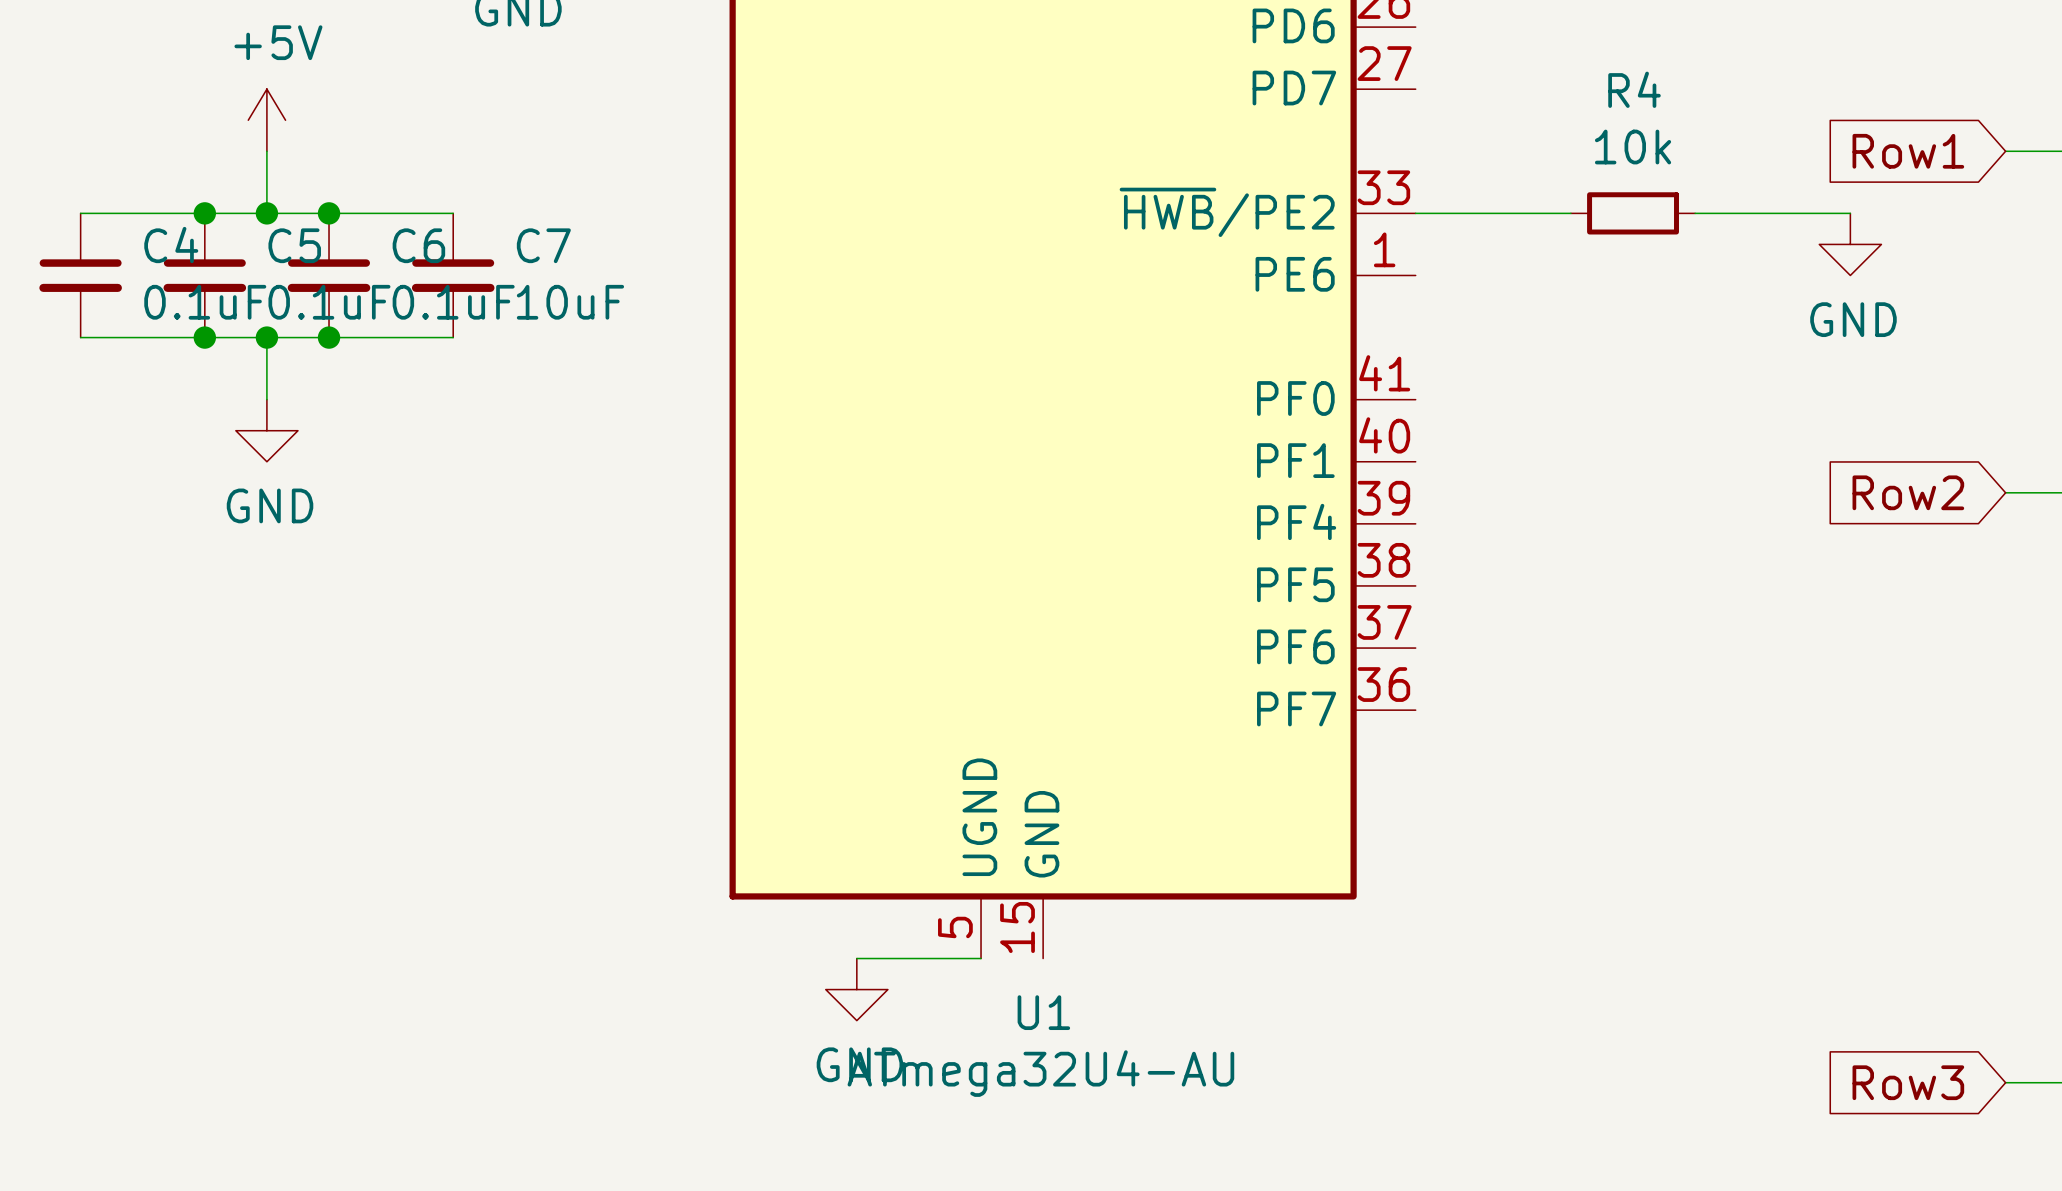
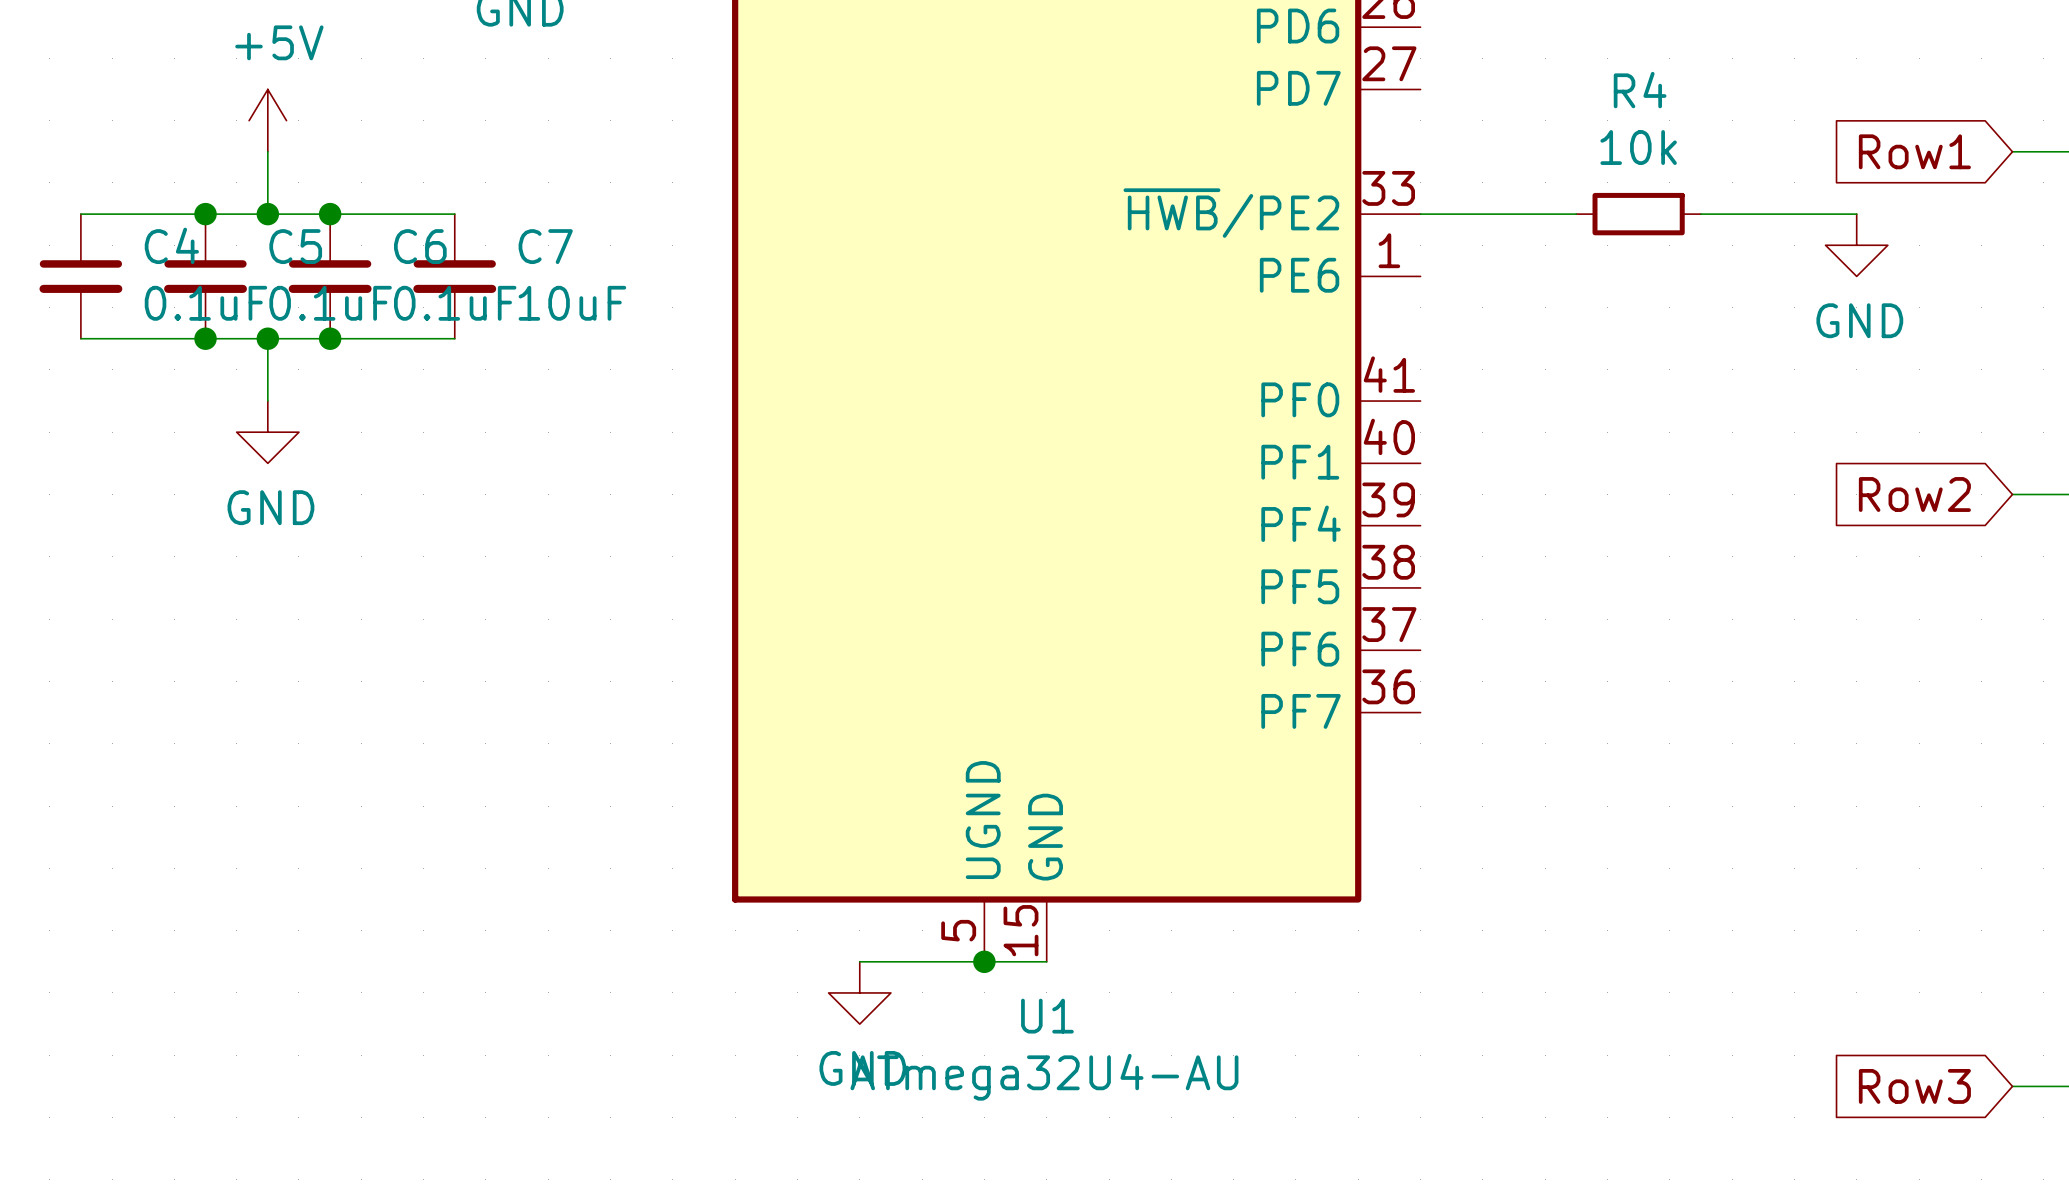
wire: none -> (984, 961) (1046, 961)
junction: none -> (984, 961)

